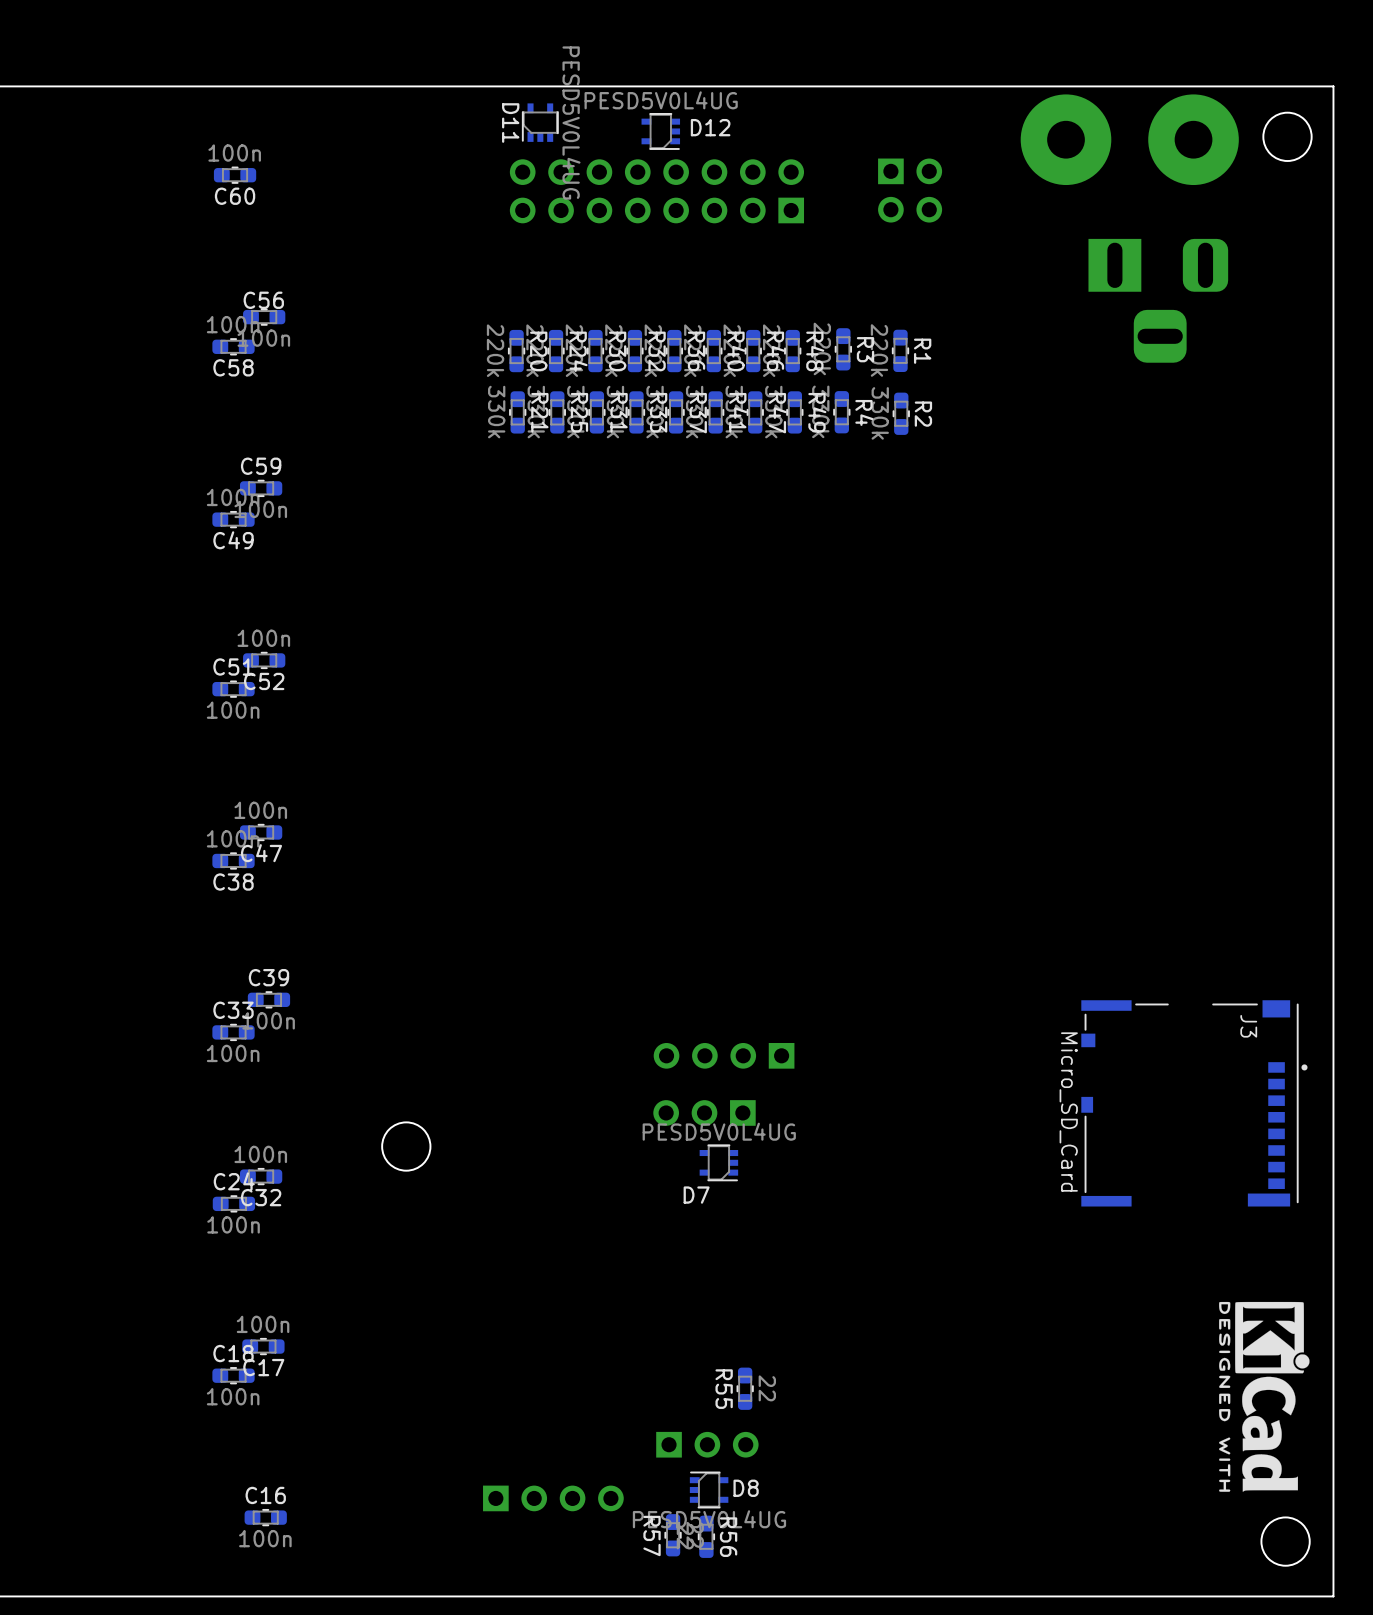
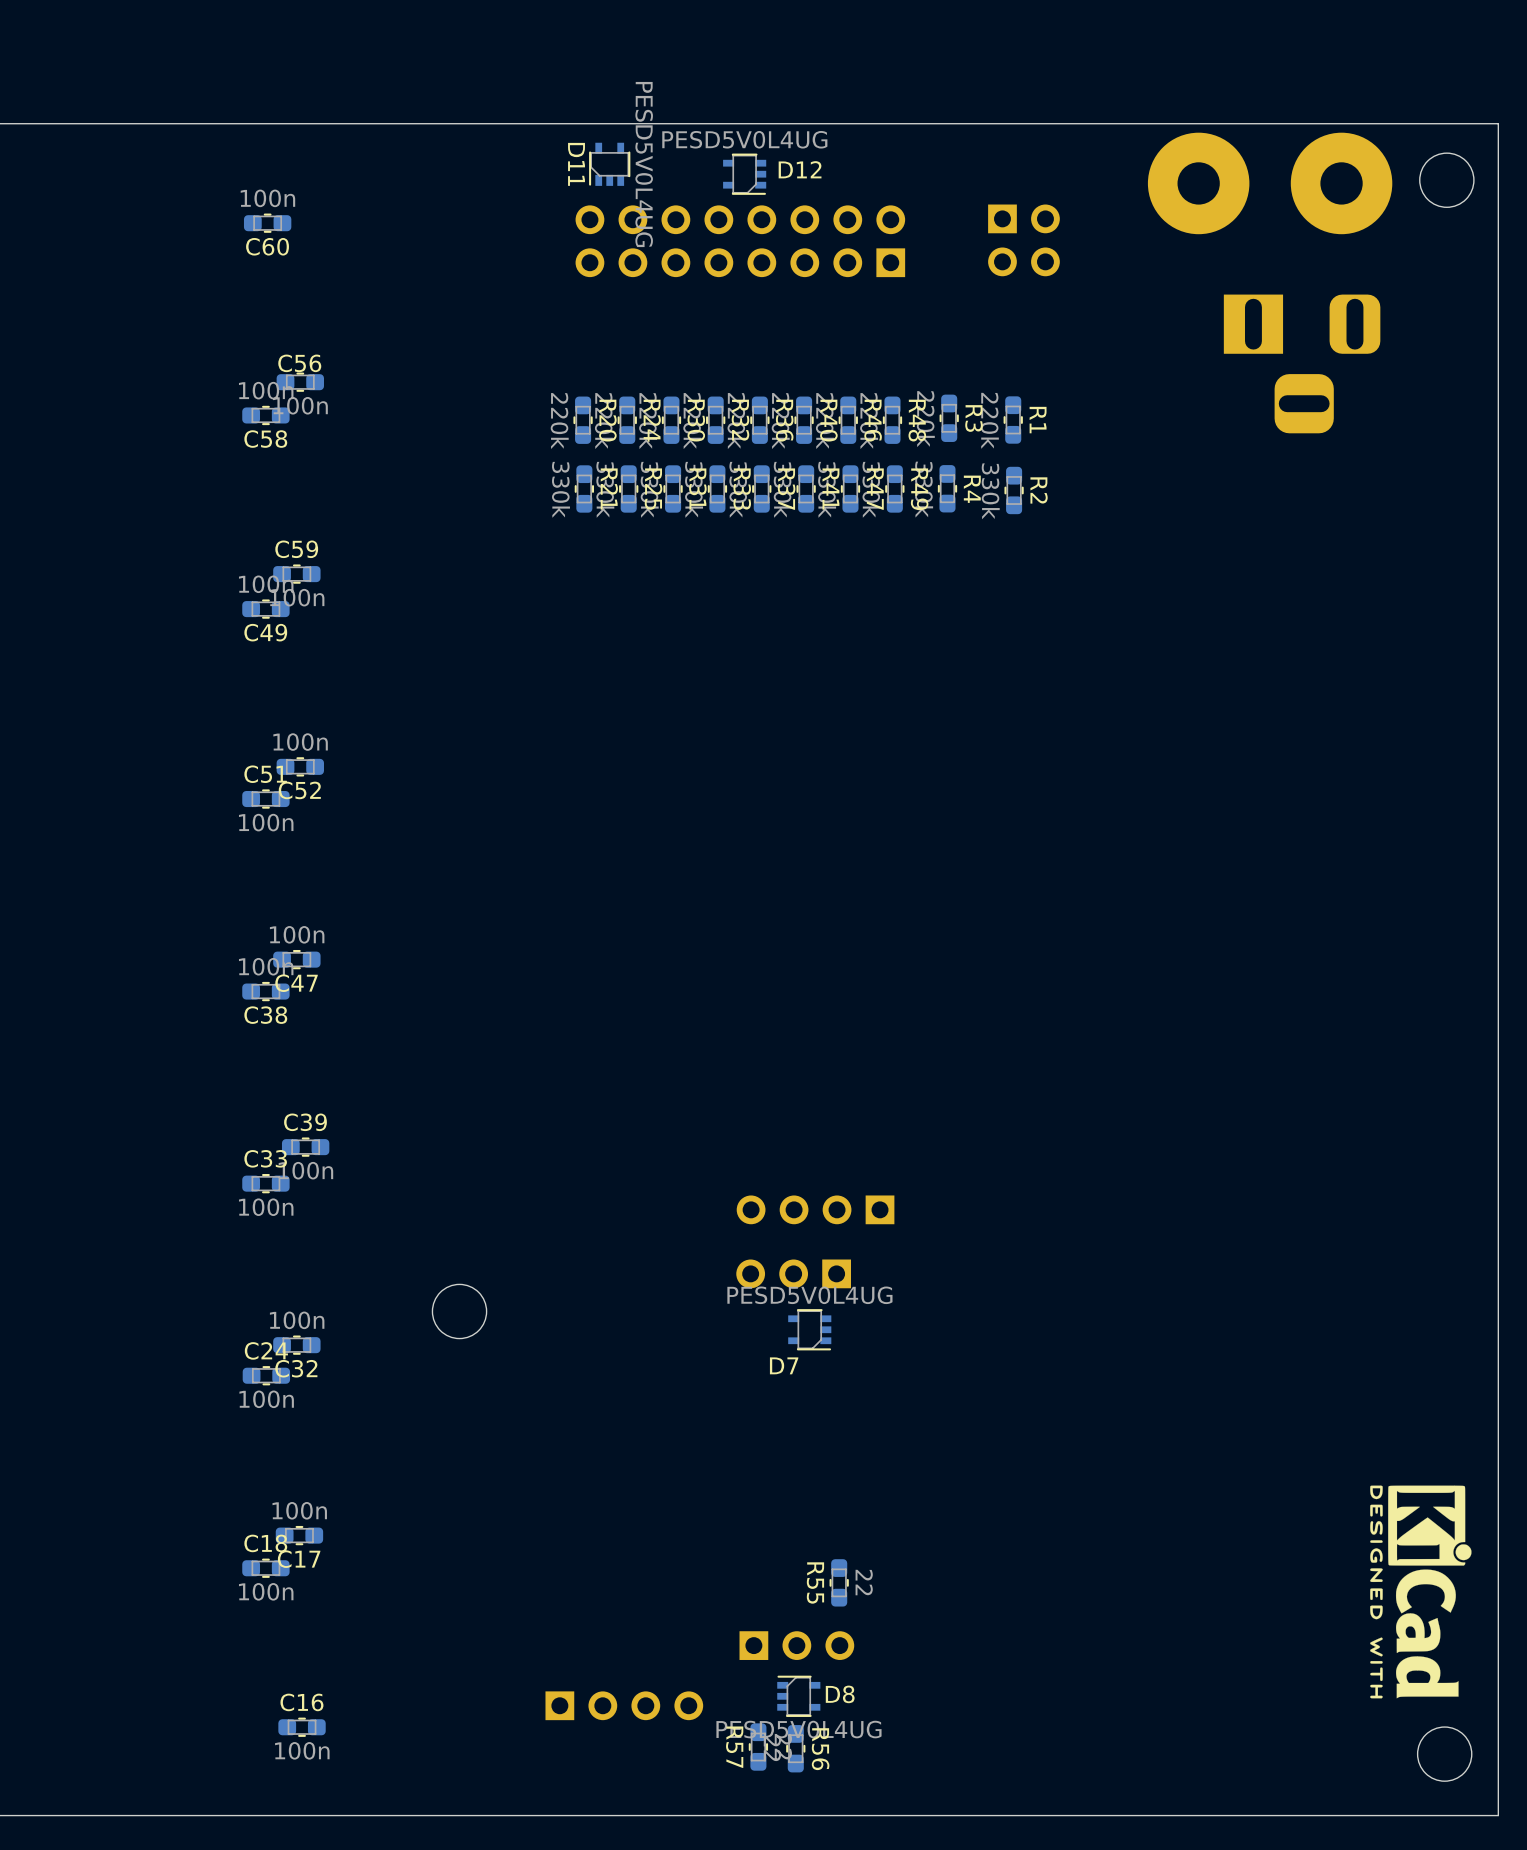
J3: Micro_SD_Card (1194, 1103) -> none

